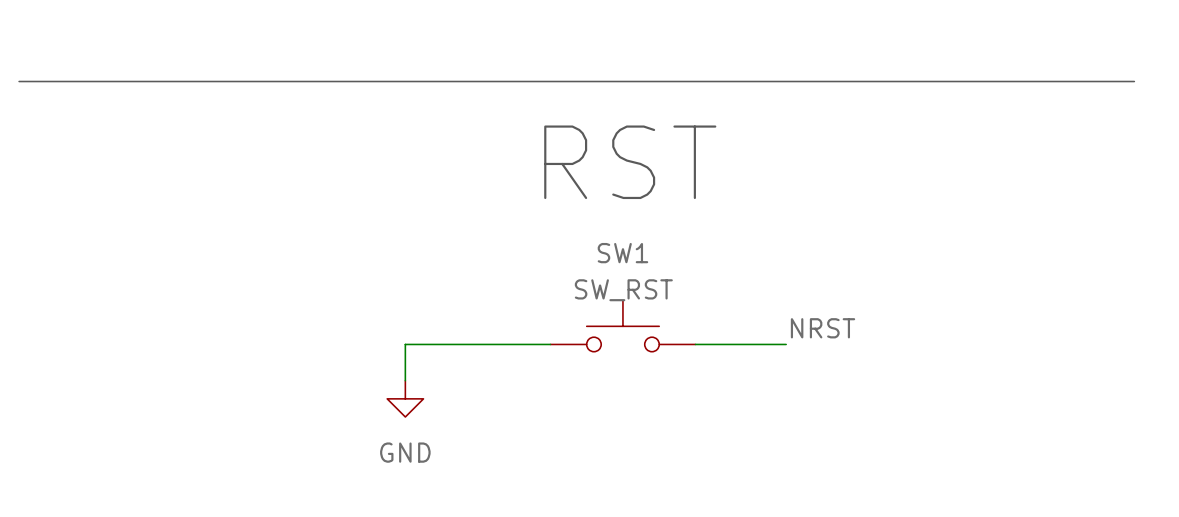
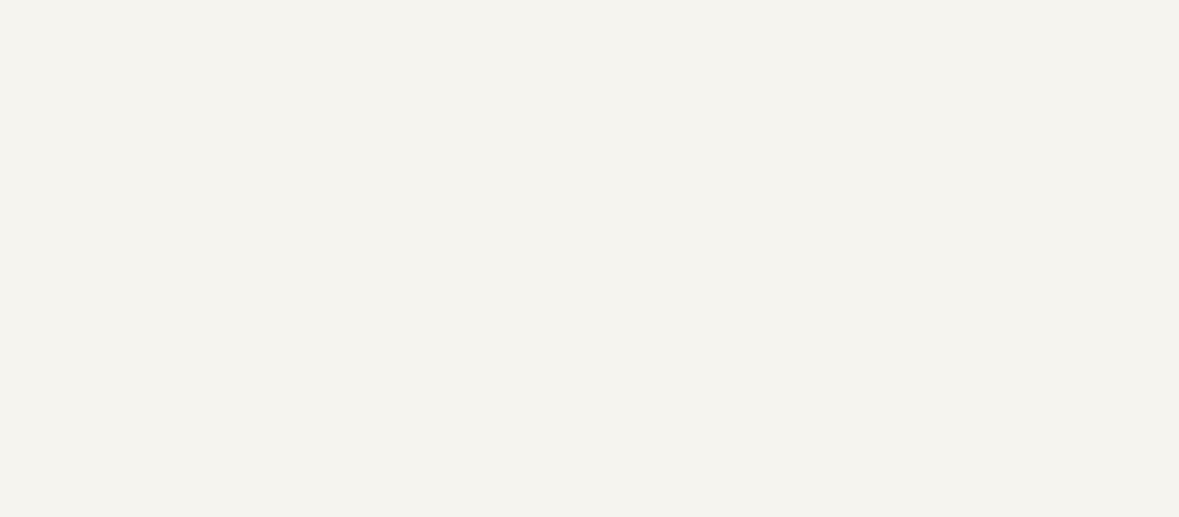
line: (19, 81) (1134, 81) -> none
text: RST (630, 162) -> none
SW1: SW_RST (622, 326) -> none
label: NRST (823, 328) -> none
wire: (550, 344) (405, 344) (405, 380) -> none
wire: (695, 344) (786, 344) -> none
power symbol: GND (405, 398) -> none

